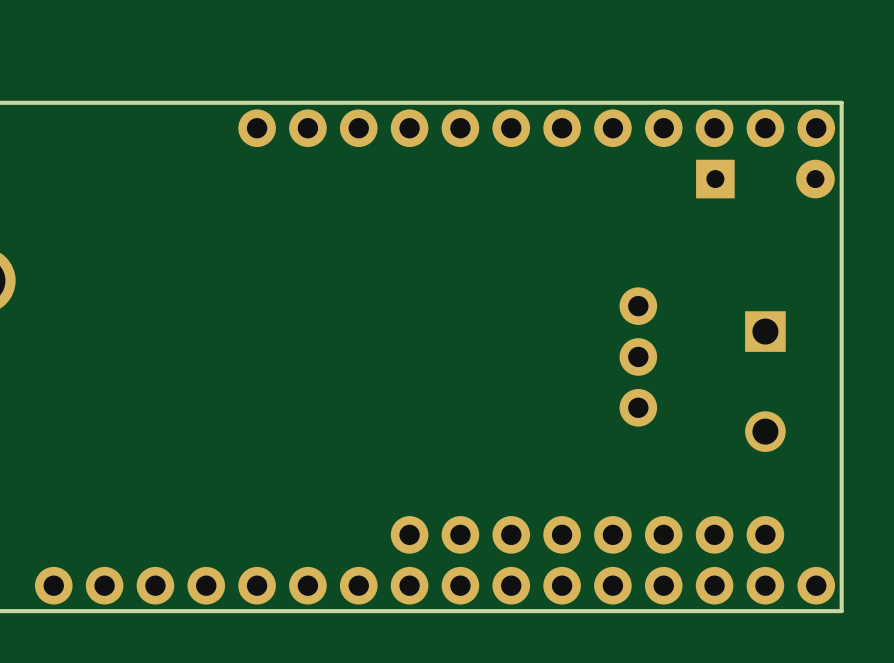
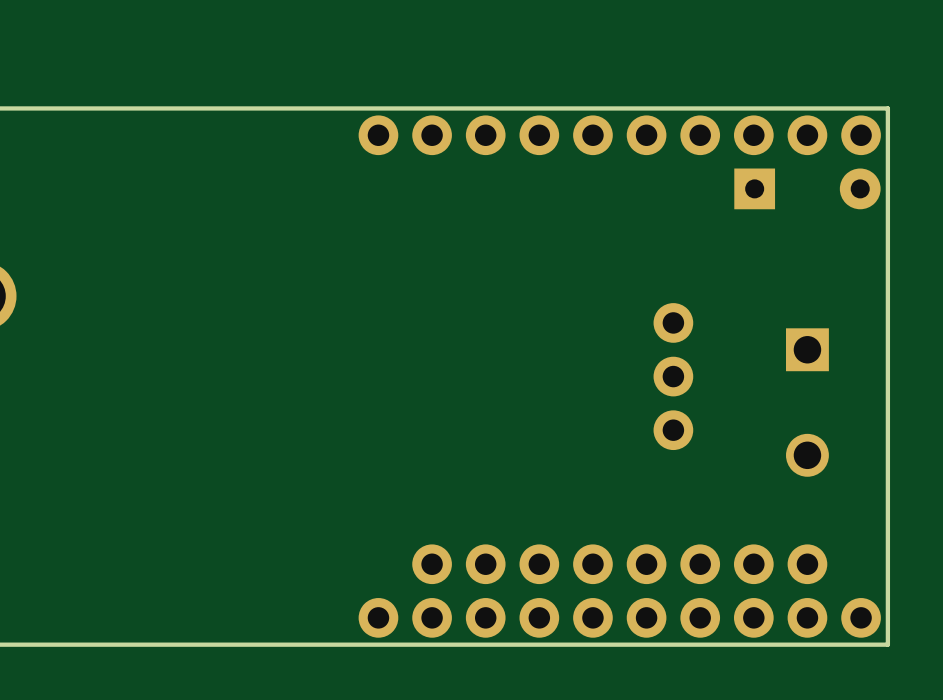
part: (536, 128) -> none
part: (435, 585) -> none

